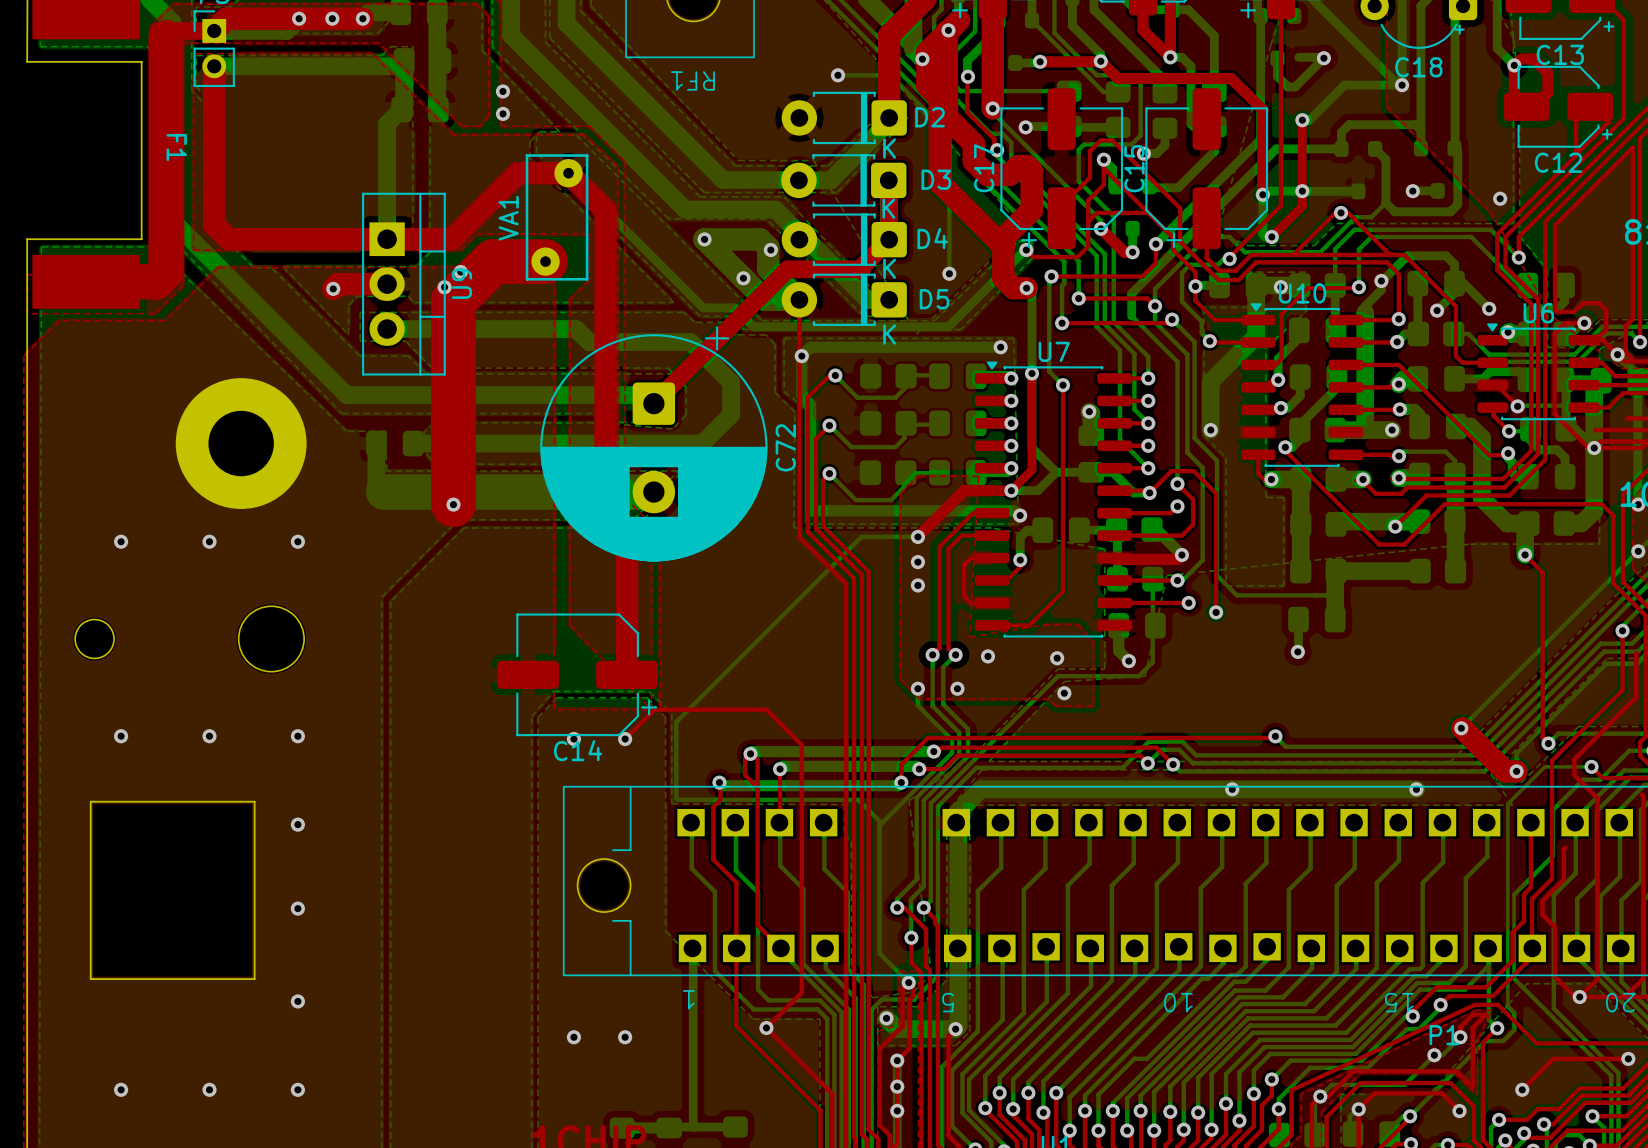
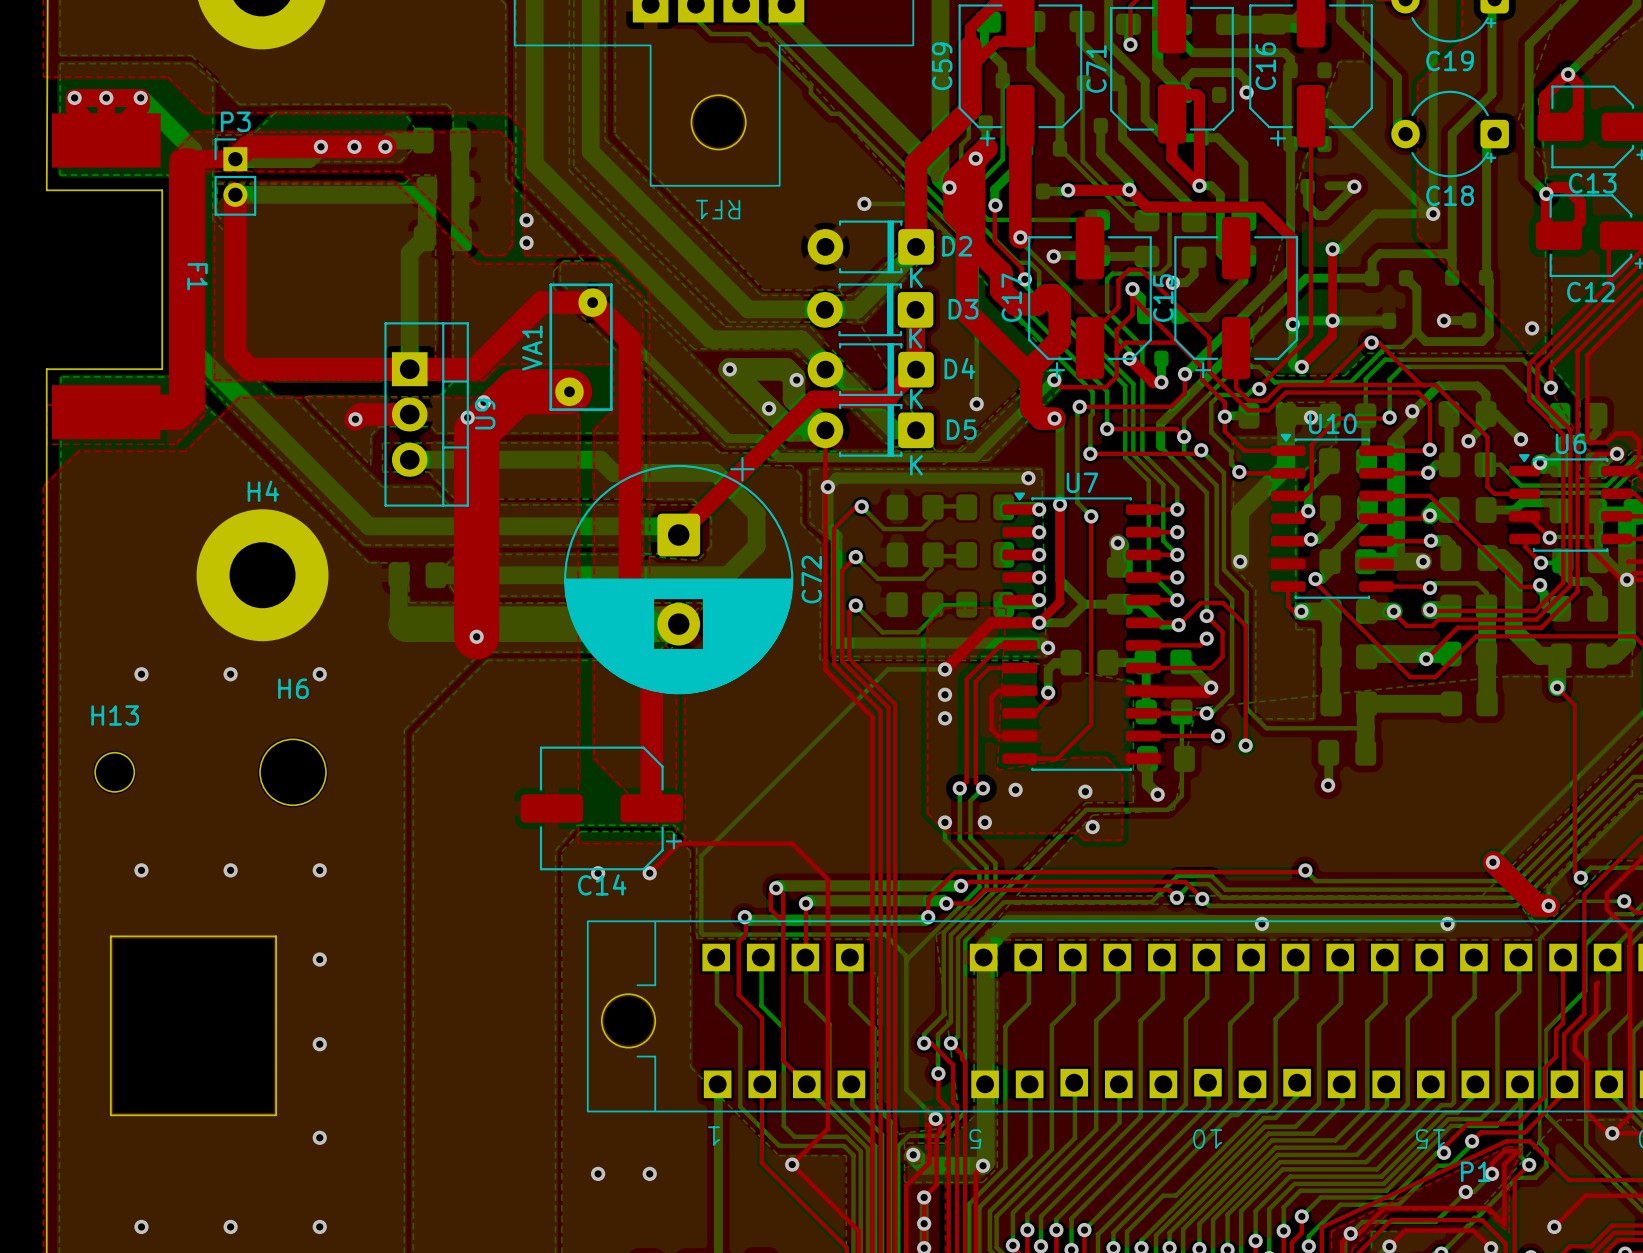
H4 name: none -> H4 (263, 491)
H6 name: none -> H6 (293, 688)
H13 name: none -> H13 (115, 715)

